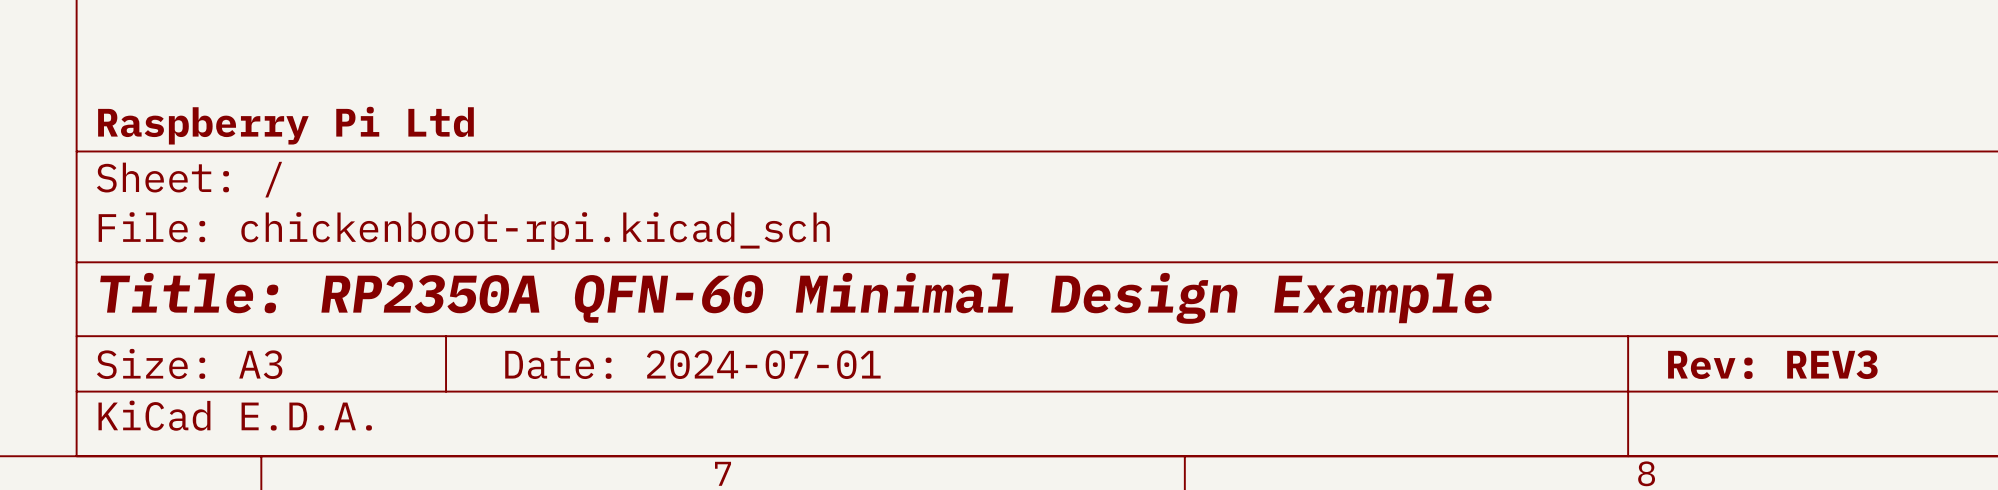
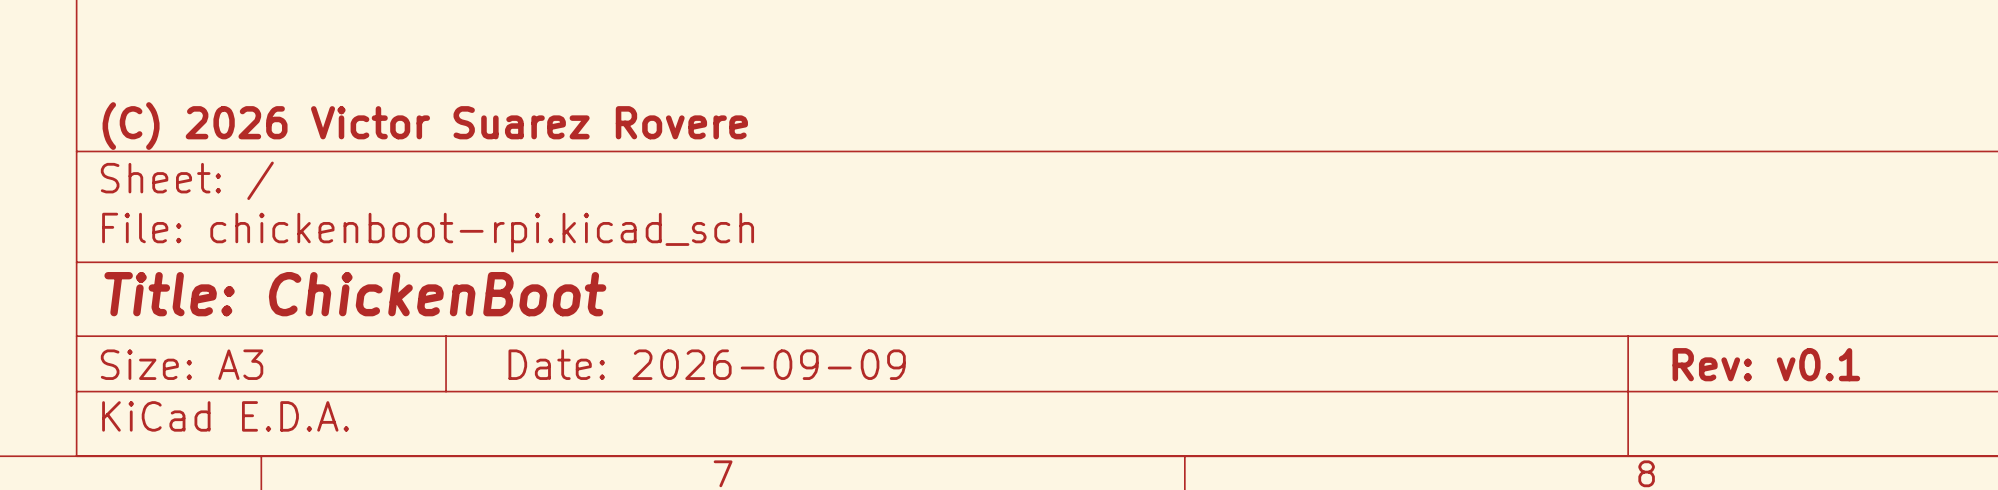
title block: Raspberry Pi Ltd (285, 125) -> (C) 2026 Victor Suarez Rovere (425, 126)
title block: Title: RP2350A QFN-60 Minimal Design Example (796, 298) -> Title: ChickenBoot (355, 294)
title block: Date: 2024-07-01 (692, 364) -> Date: 2026-09-09 (707, 364)
title block: Rev: REV3 (1772, 364) -> Rev: v0.1 (1766, 364)

